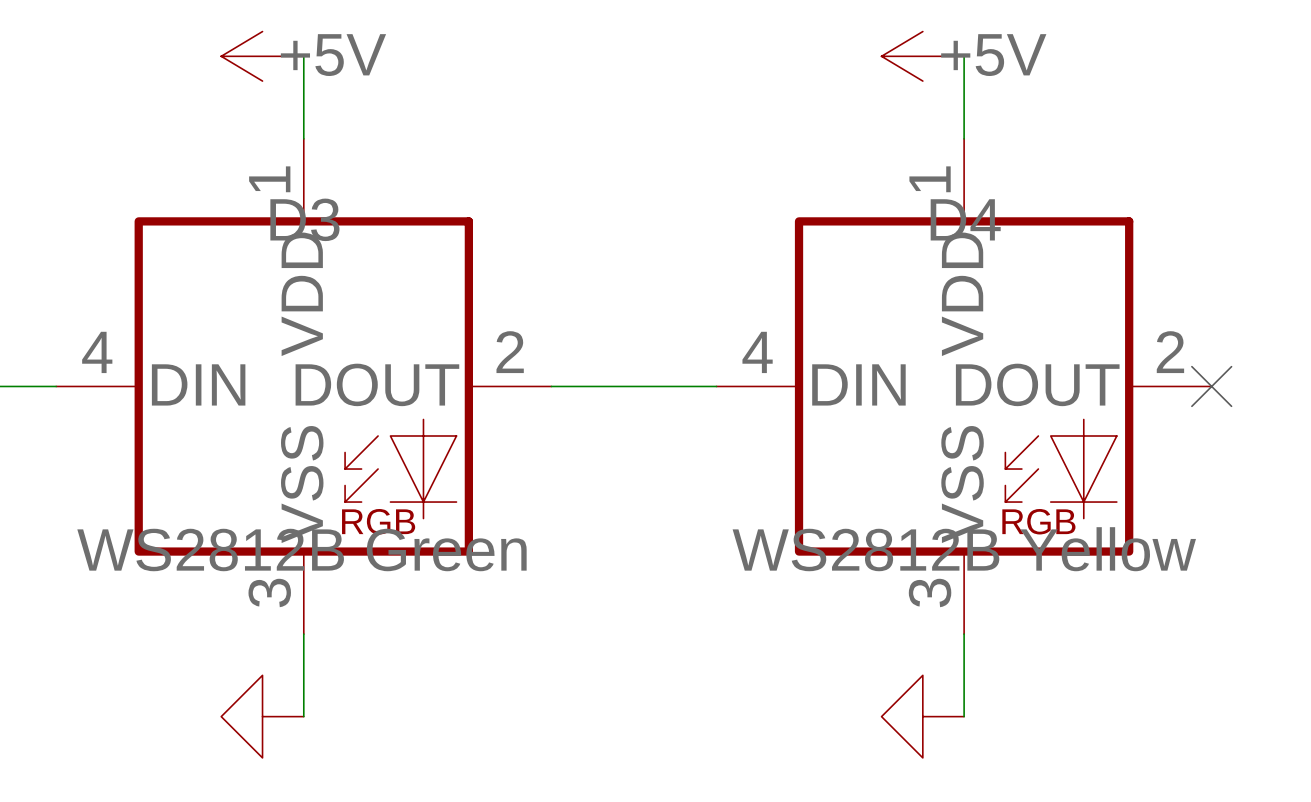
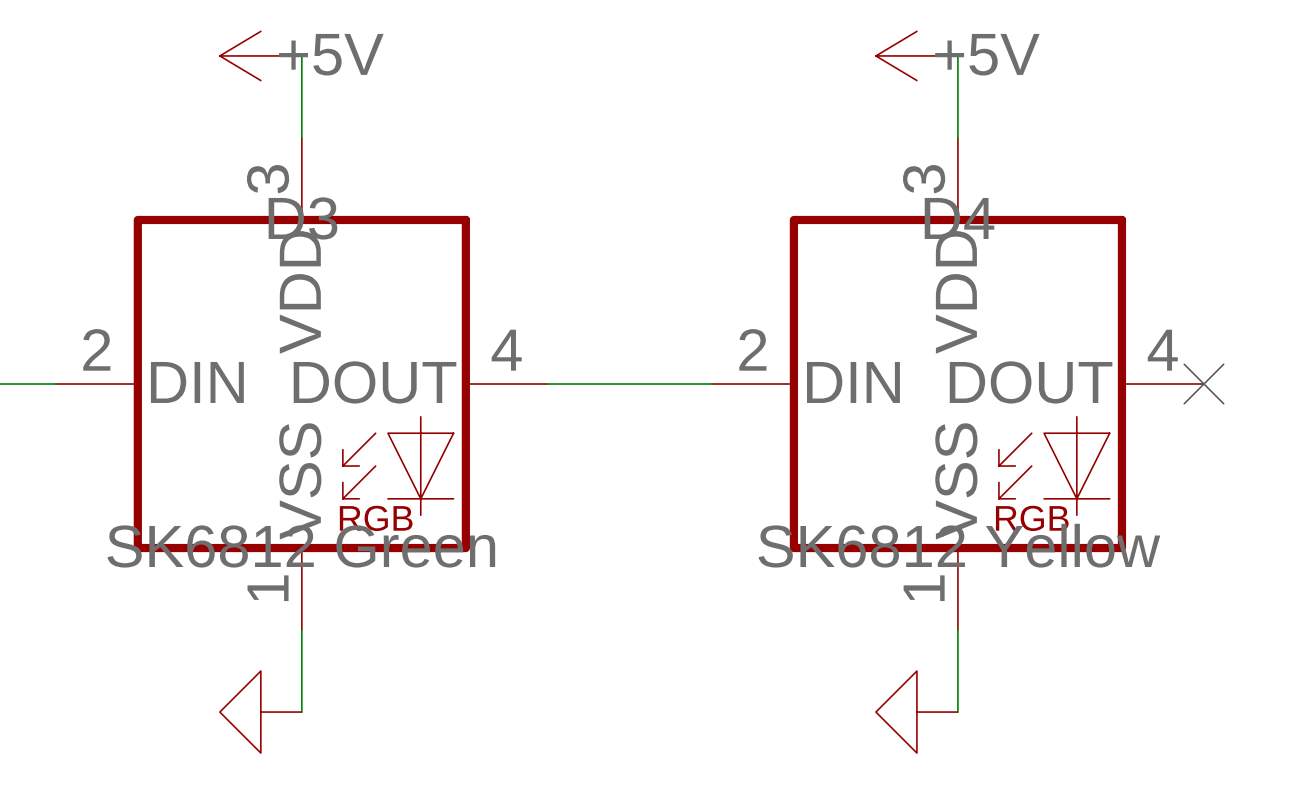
D3 pin number: 1 (269, 179) -> 3 (268, 179)
D4 pin number: 1 (930, 179) -> 3 (924, 179)
D3 pin number: 4 (97, 352) -> 2 (96, 349)
D3 pin number: 2 (510, 352) -> 4 (506, 350)
D4 pin number: 4 (757, 352) -> 2 (752, 349)
D4 pin number: 2 (1170, 352) -> 4 (1162, 350)
D3 value: WS2812B Green (301, 549) -> SK6812 Green (301, 546)
D4 value: WS2812B Yellow (964, 549) -> SK6812 Yellow (959, 545)
D3 pin number: 3 (269, 592) -> 1 (268, 588)
D4 pin number: 3 (930, 592) -> 1 (924, 588)

